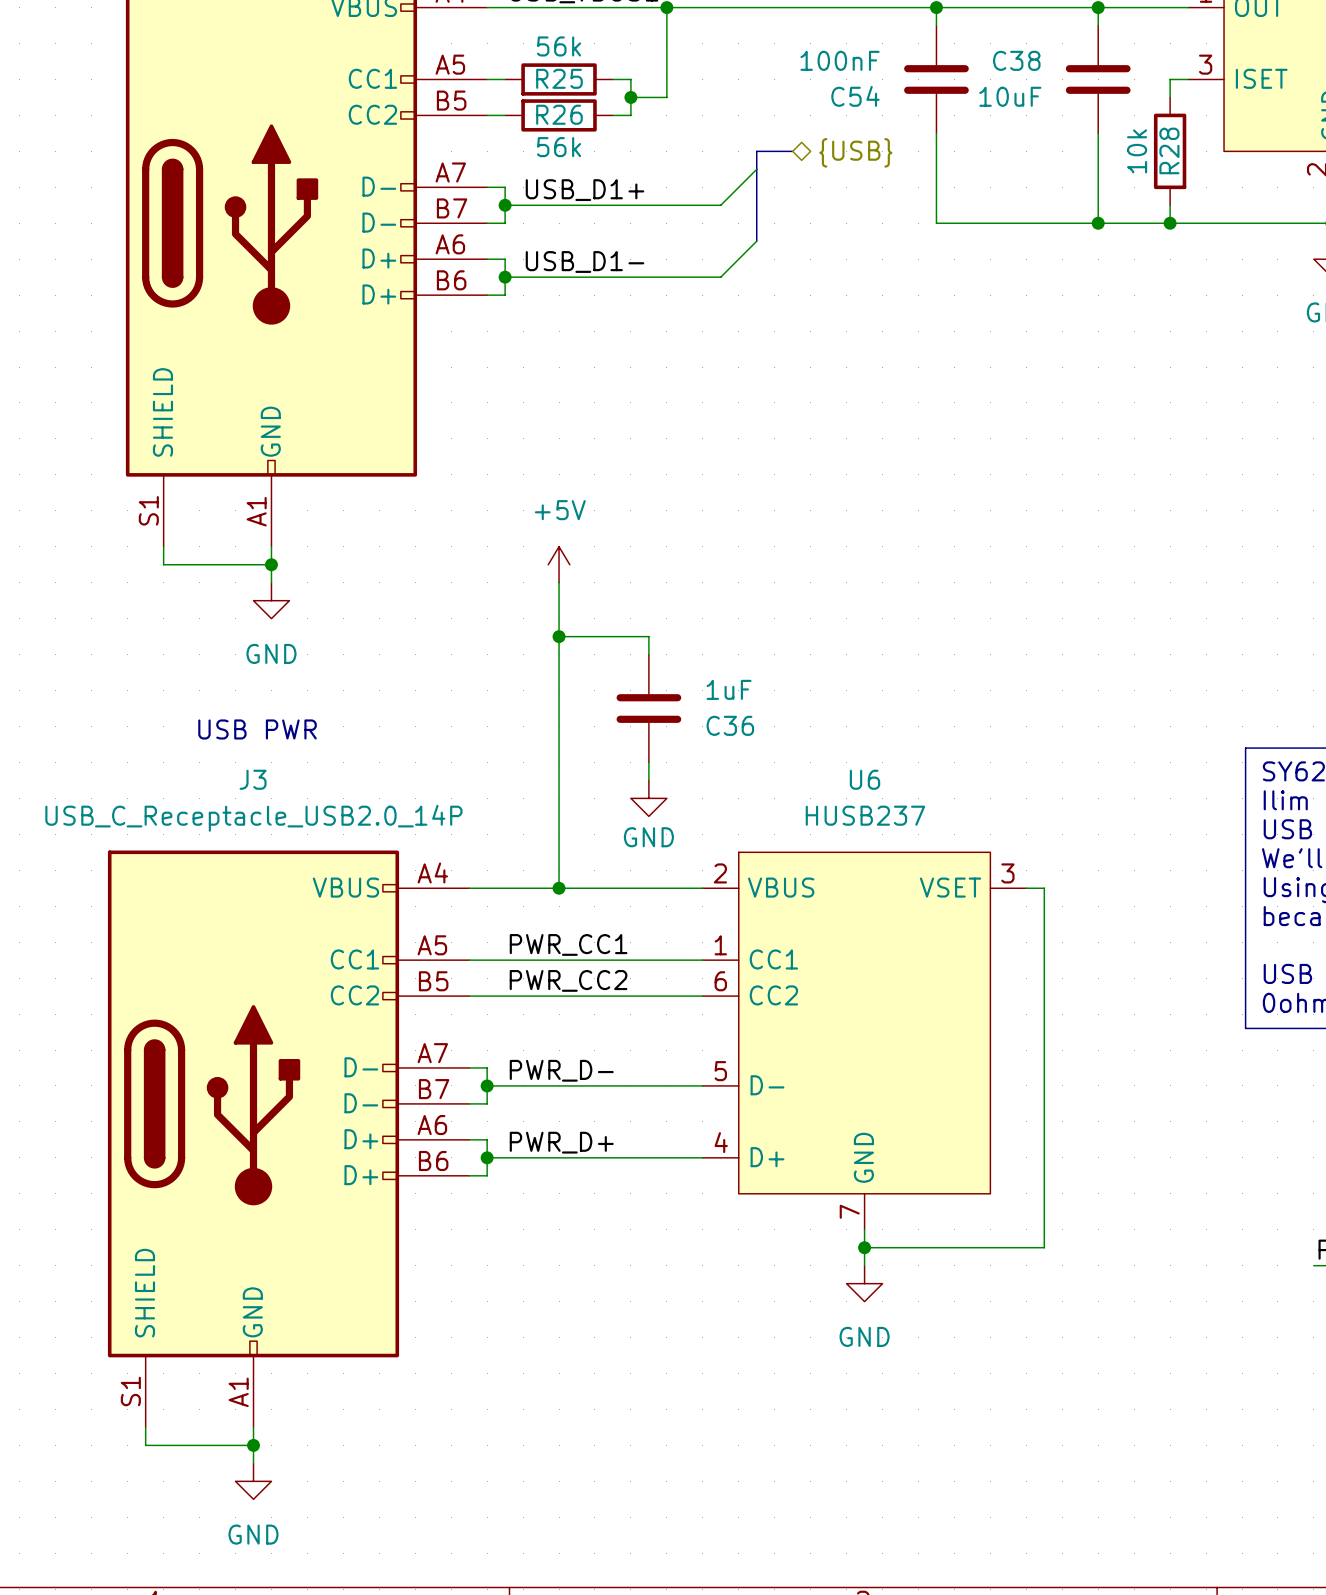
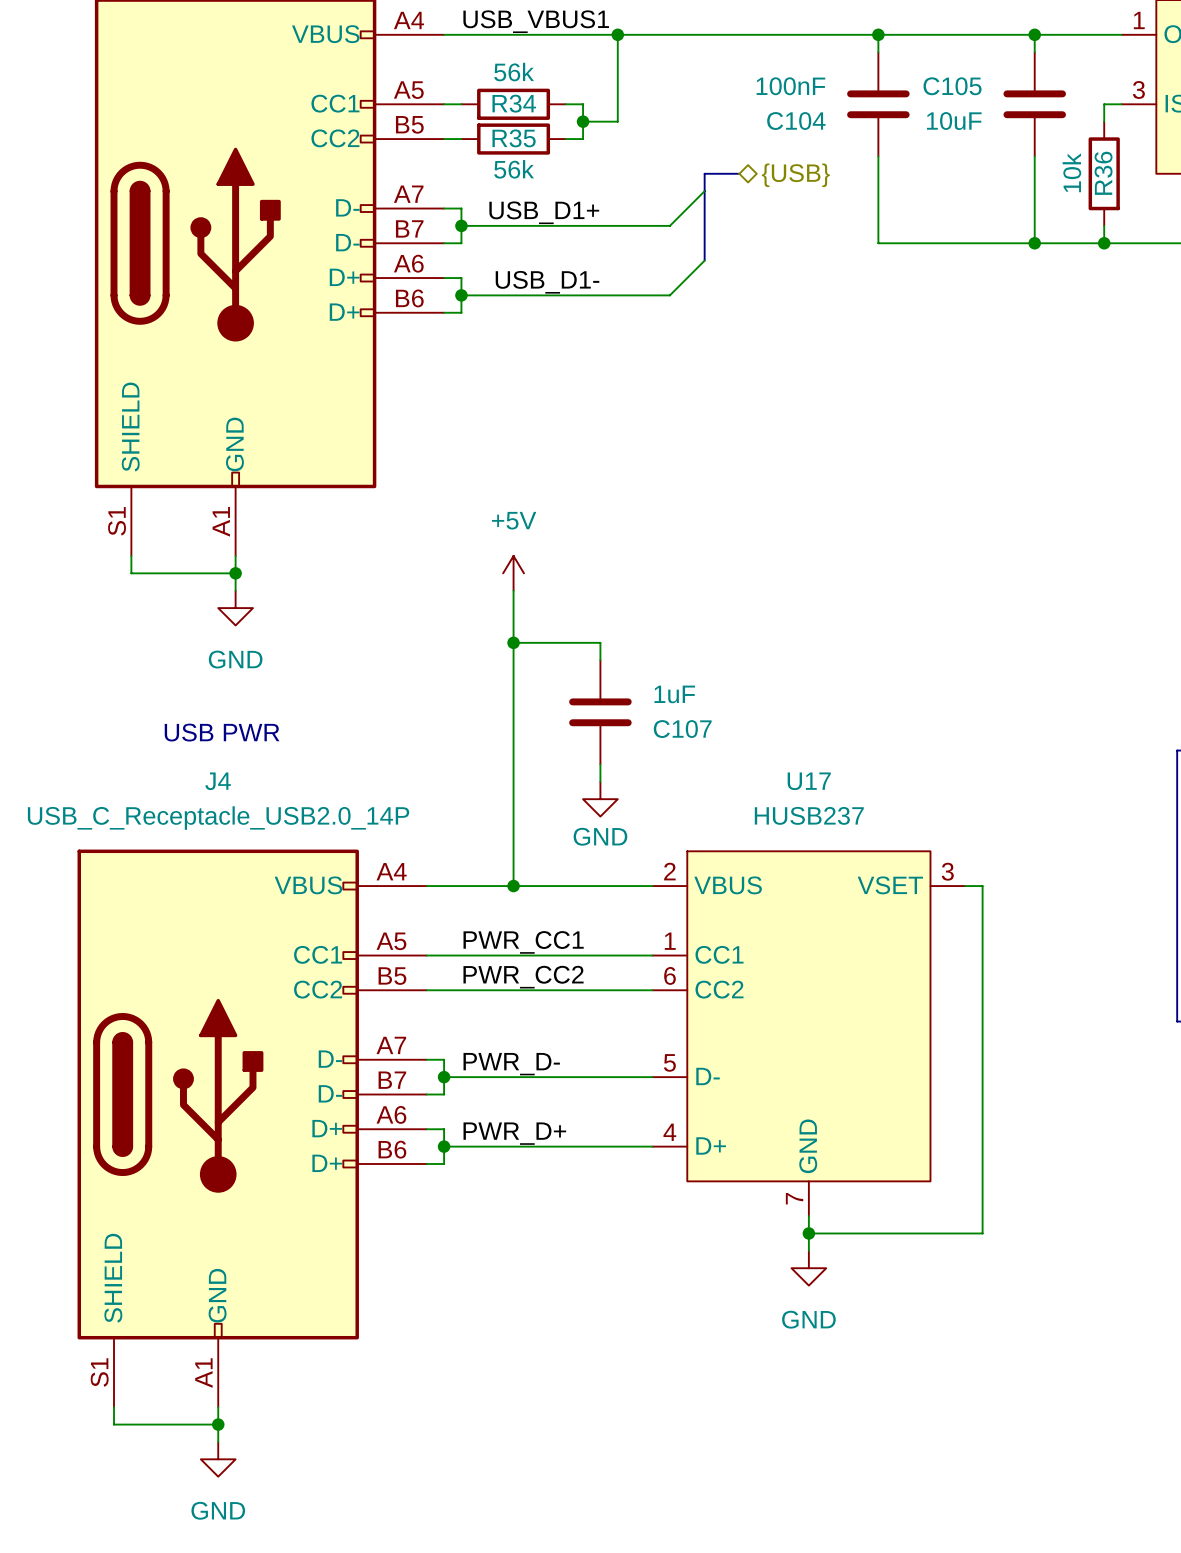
C38 name: C38 (1016, 60) -> C105 (952, 86)
R25 name: R25 (559, 78) -> R34 (514, 103)
C54 name: C54 (855, 96) -> C104 (796, 121)
R26 name: R26 (559, 114) -> R35 (514, 138)
R28 name: R28 (1169, 150) -> R36 (1103, 173)
C36 name: C36 (730, 725) -> C107 (682, 729)
J3 name: J3 (253, 779) -> J4 (218, 781)
U6 name: U6 (865, 779) -> U17 (809, 781)

